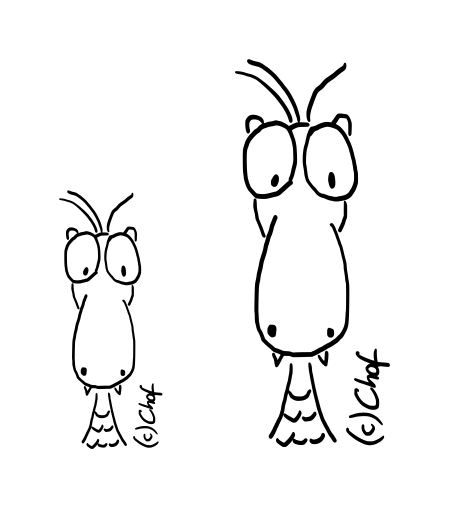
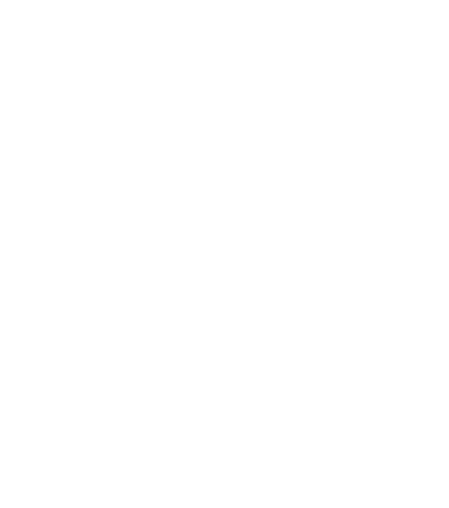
drawing: [235, 59, 390, 448] -> none
drawing: [59, 190, 163, 449] -> none

